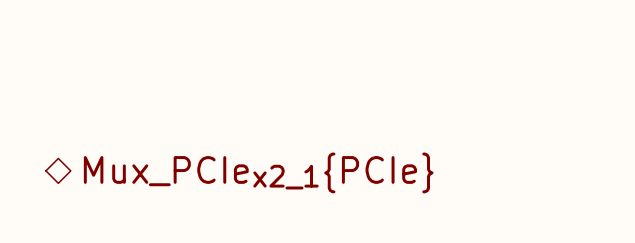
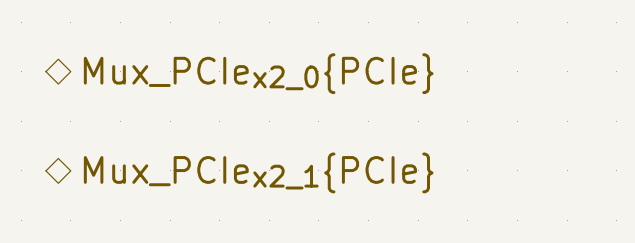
hierarchical label: none -> Mux_PCIex2_0{PCIe} (258, 73)

